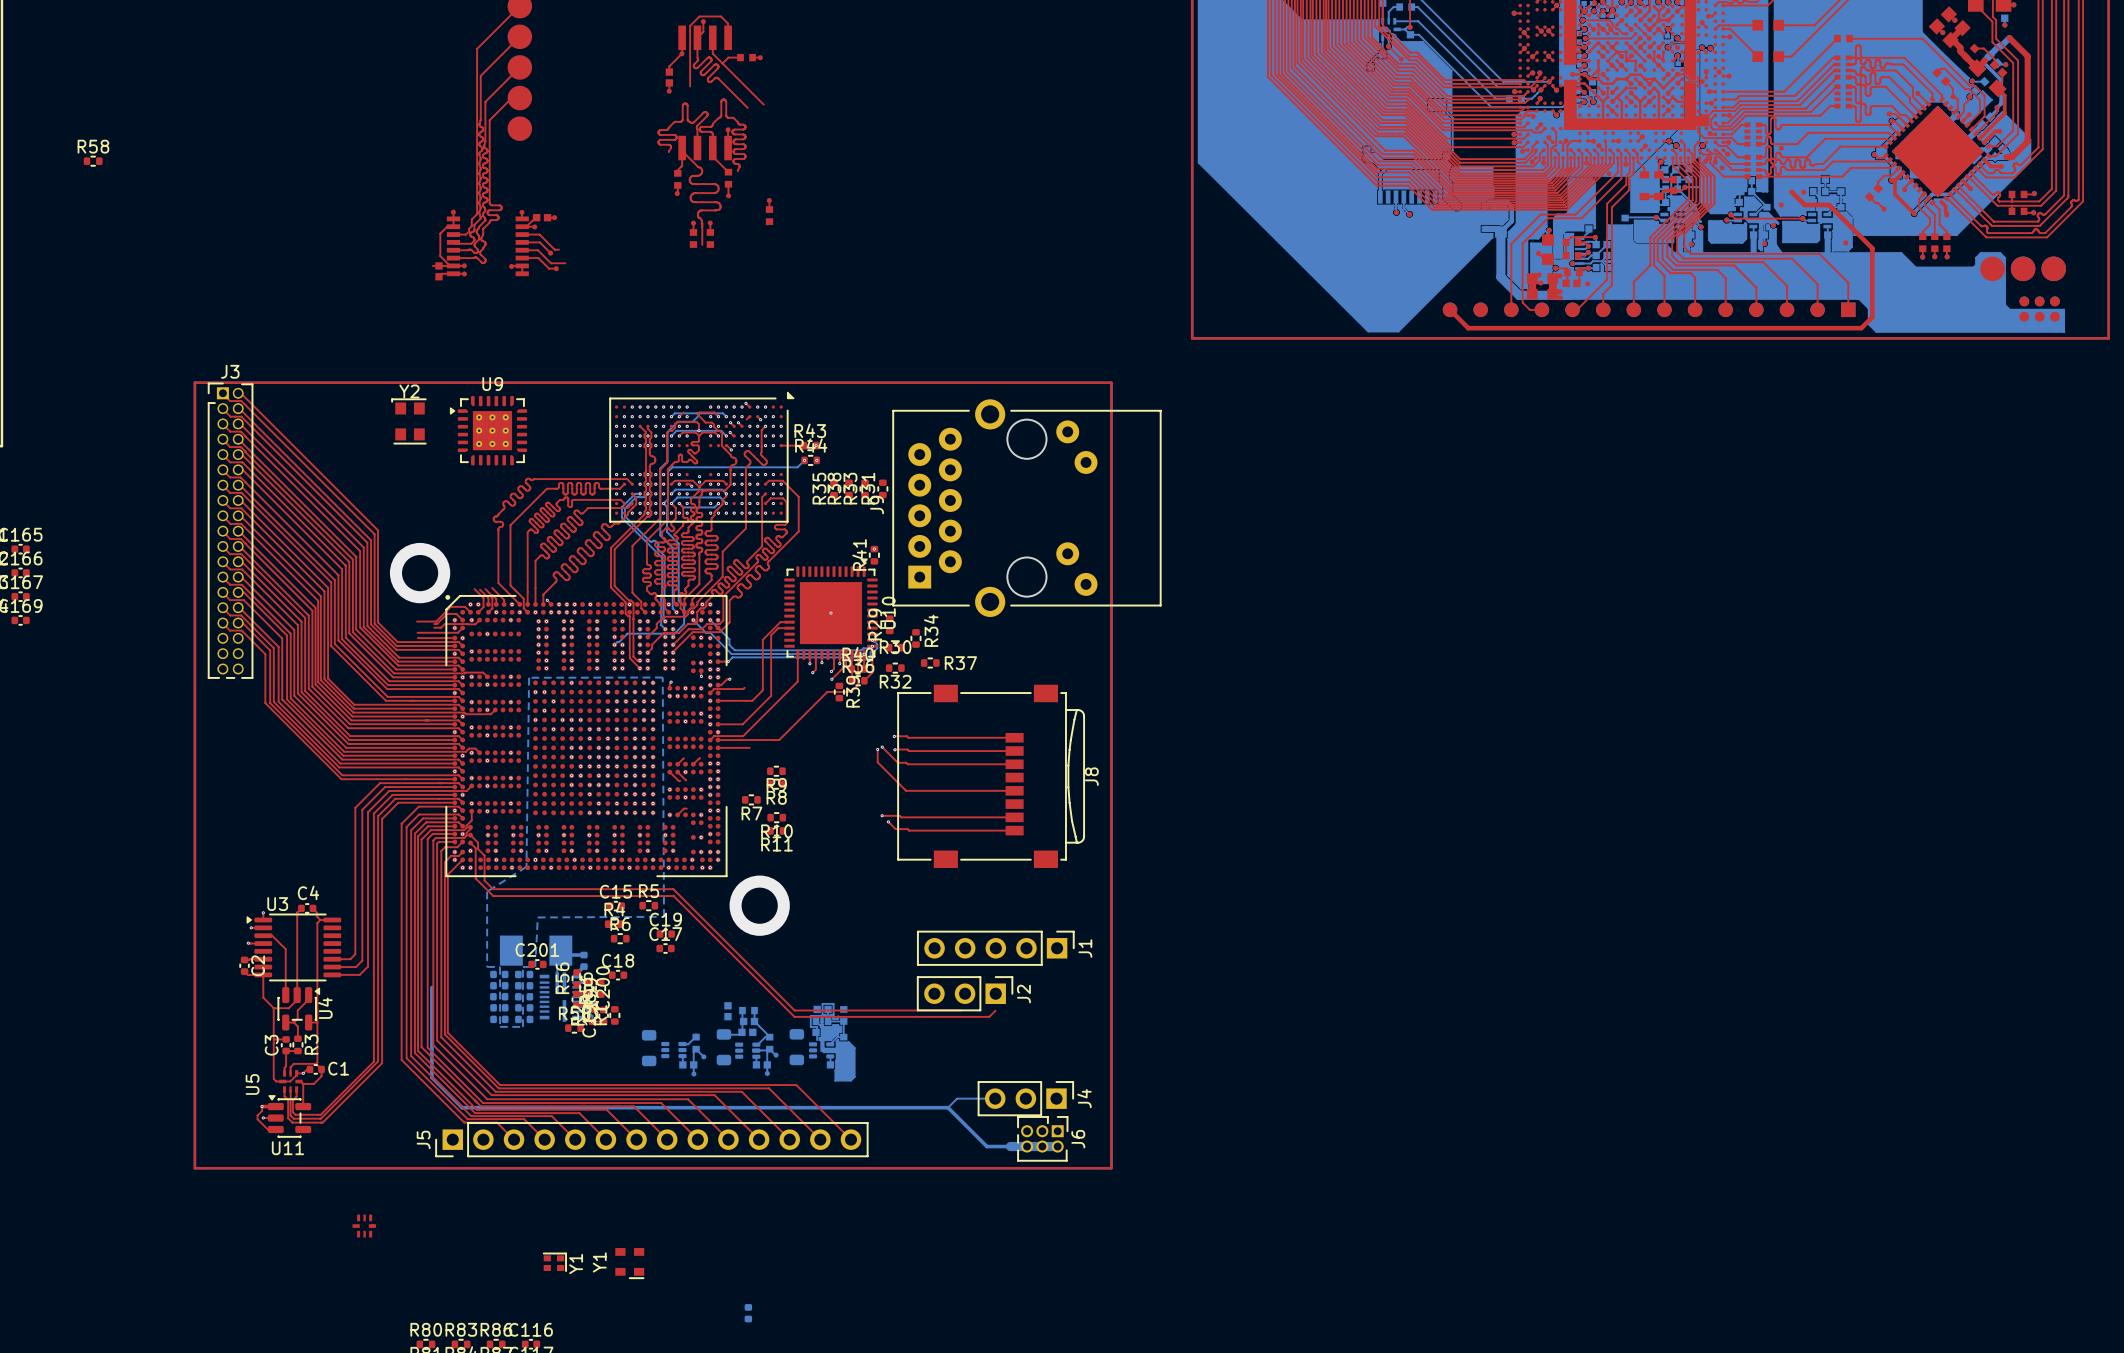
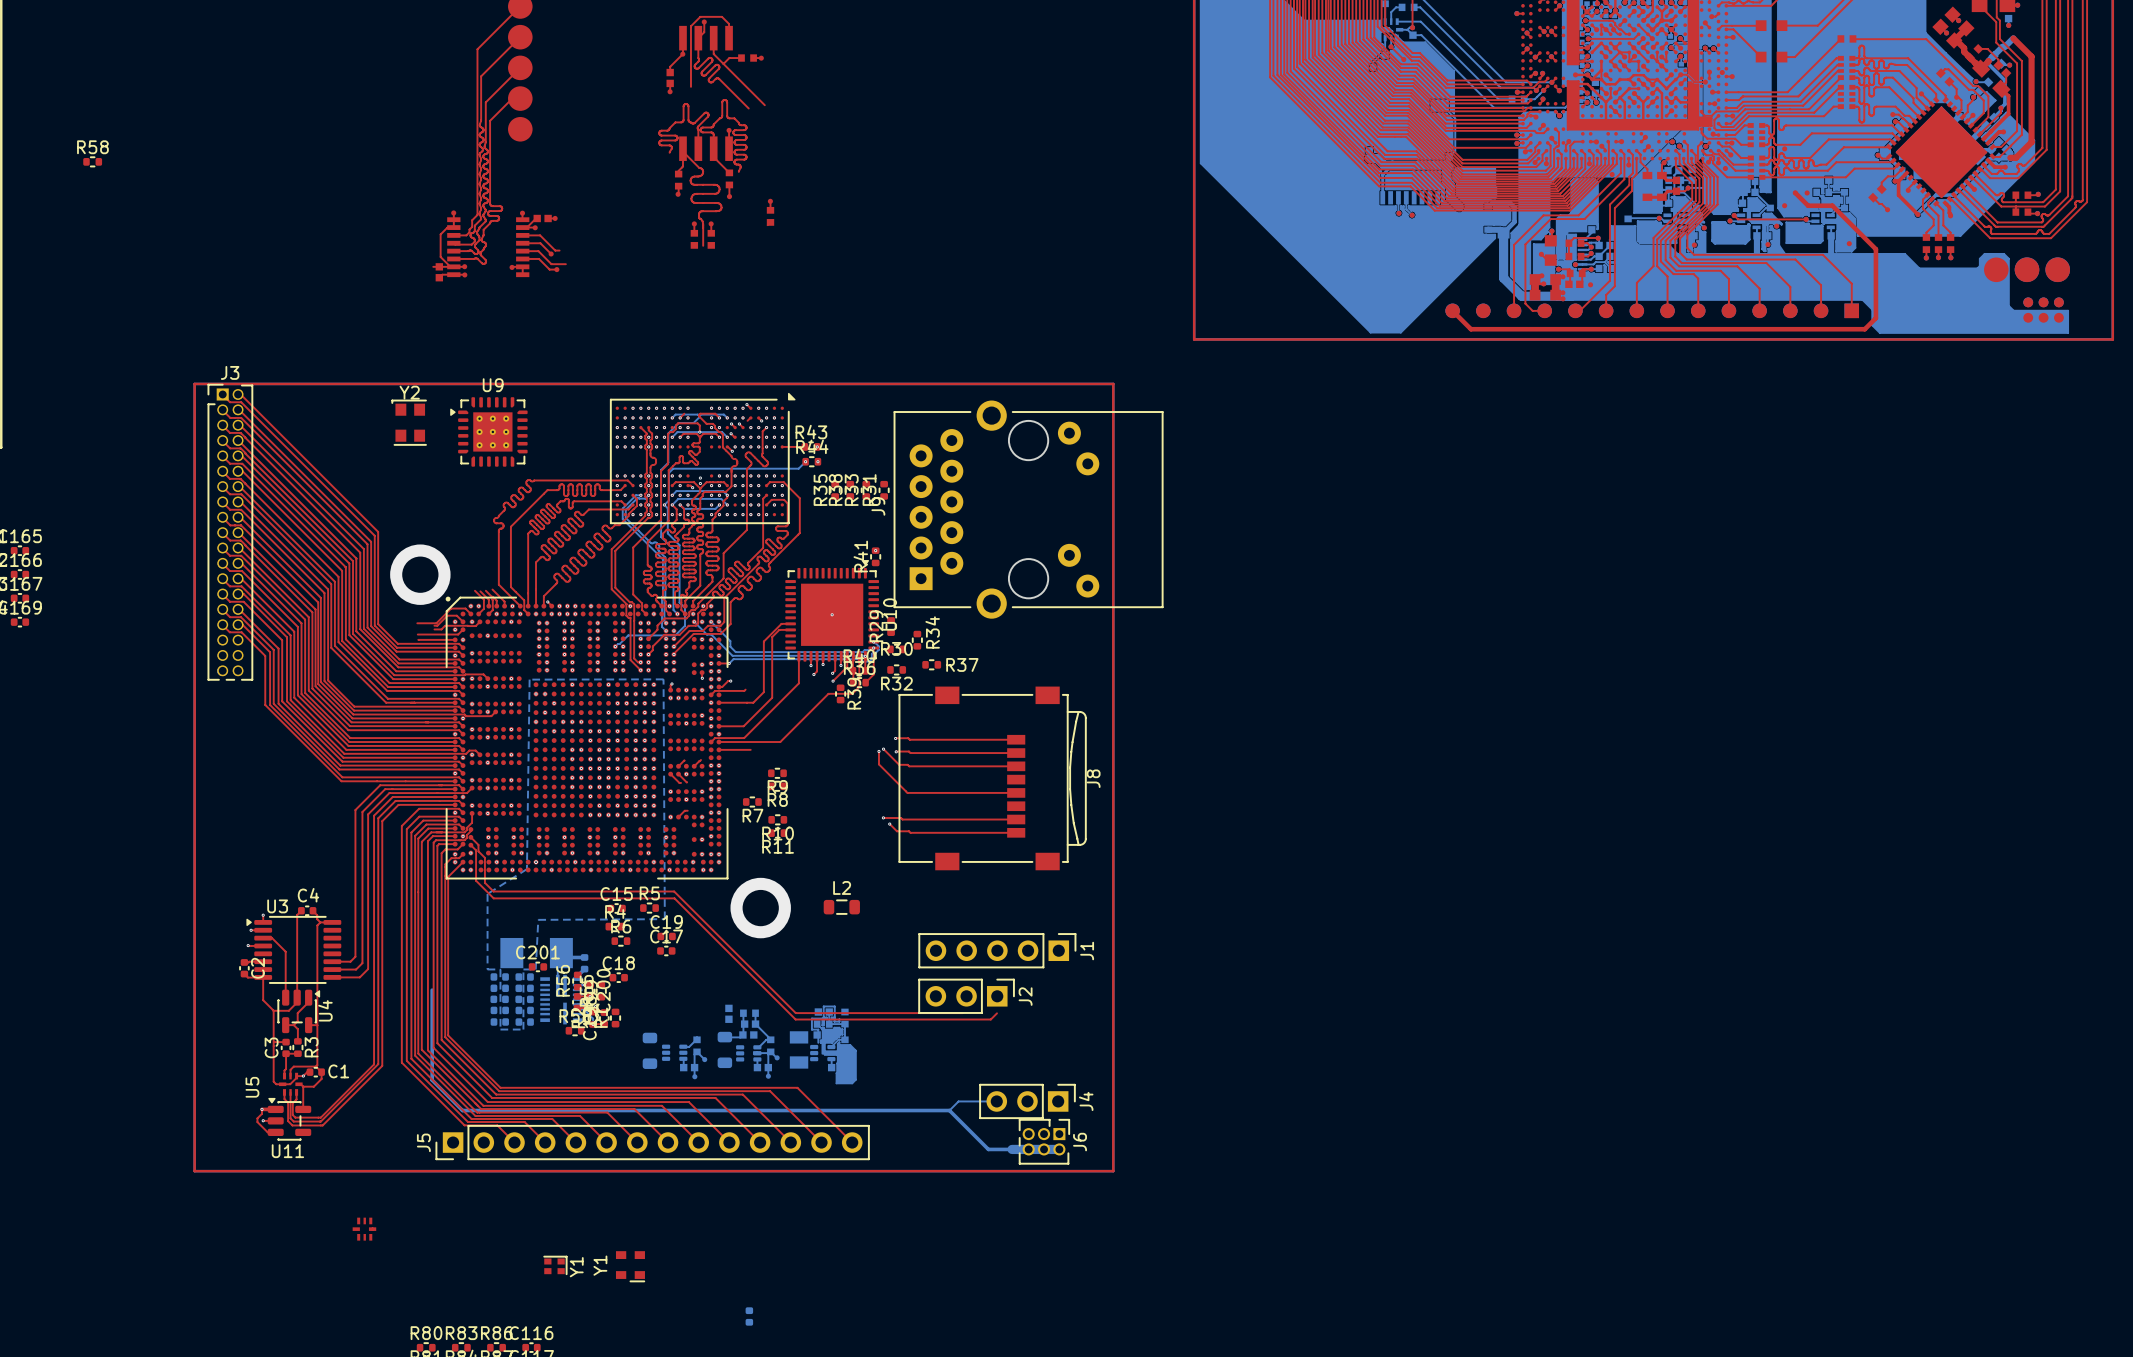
L2: none -> (841, 907)
part footprint: [789, 1029, 805, 1066] -> [789, 1031, 809, 1069]

